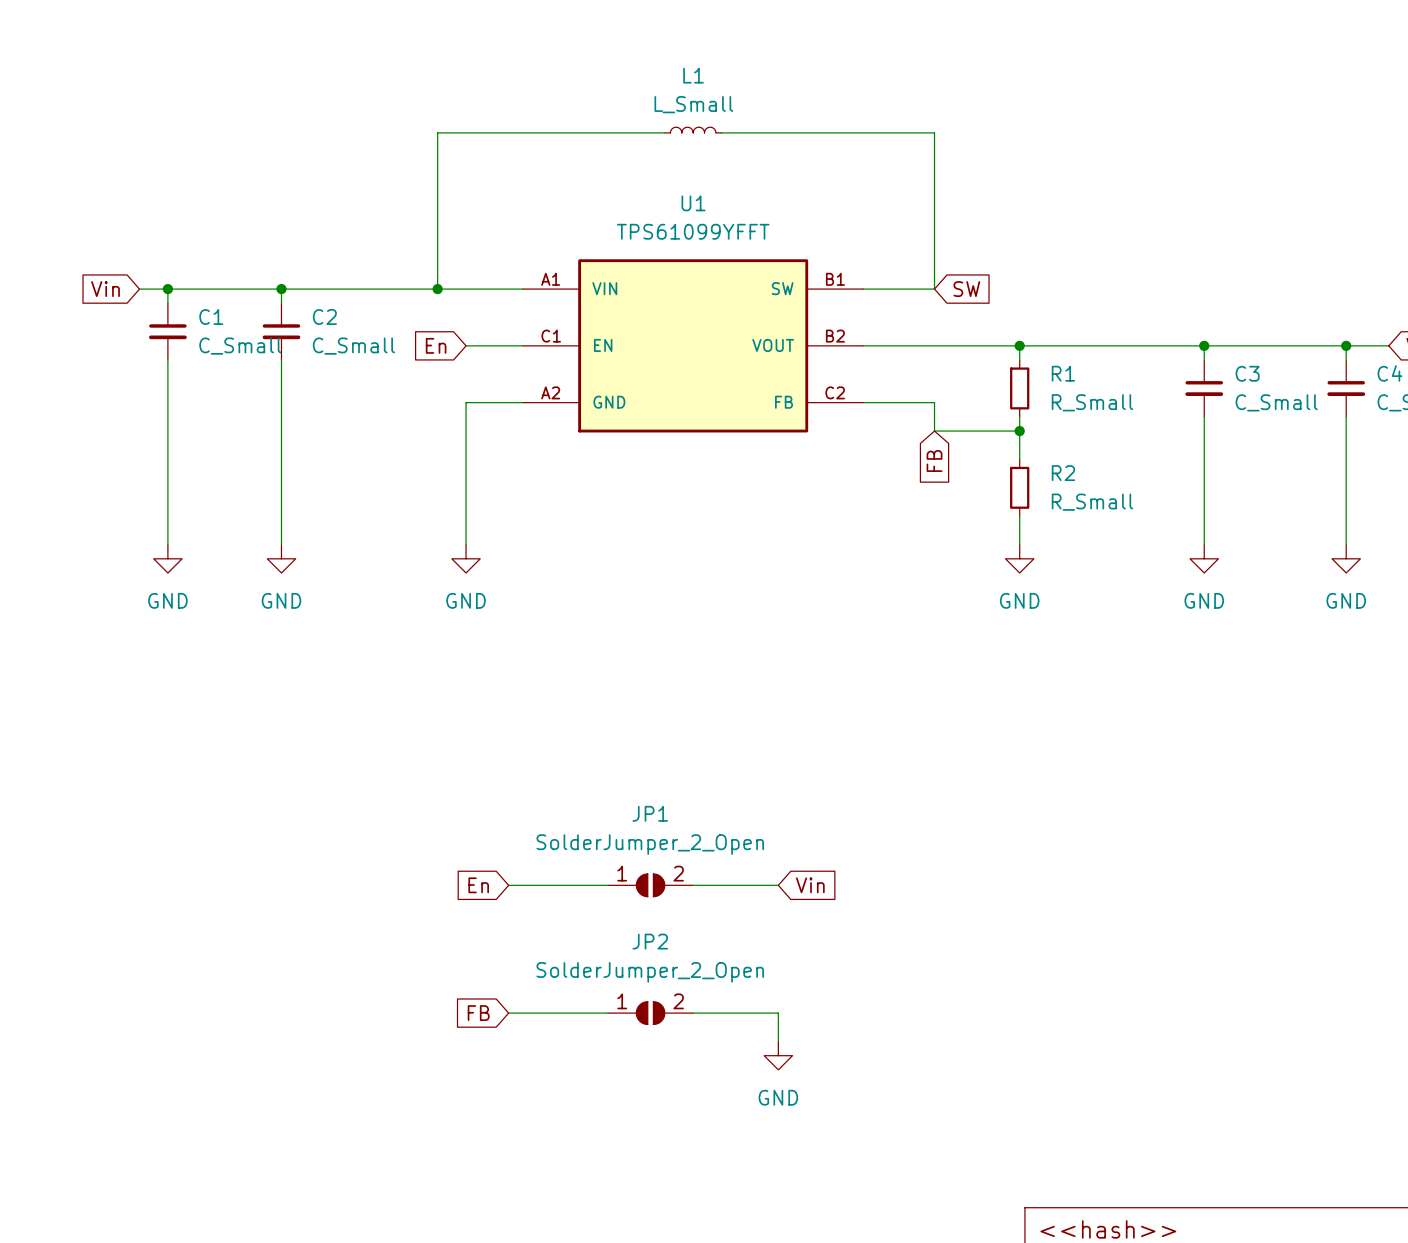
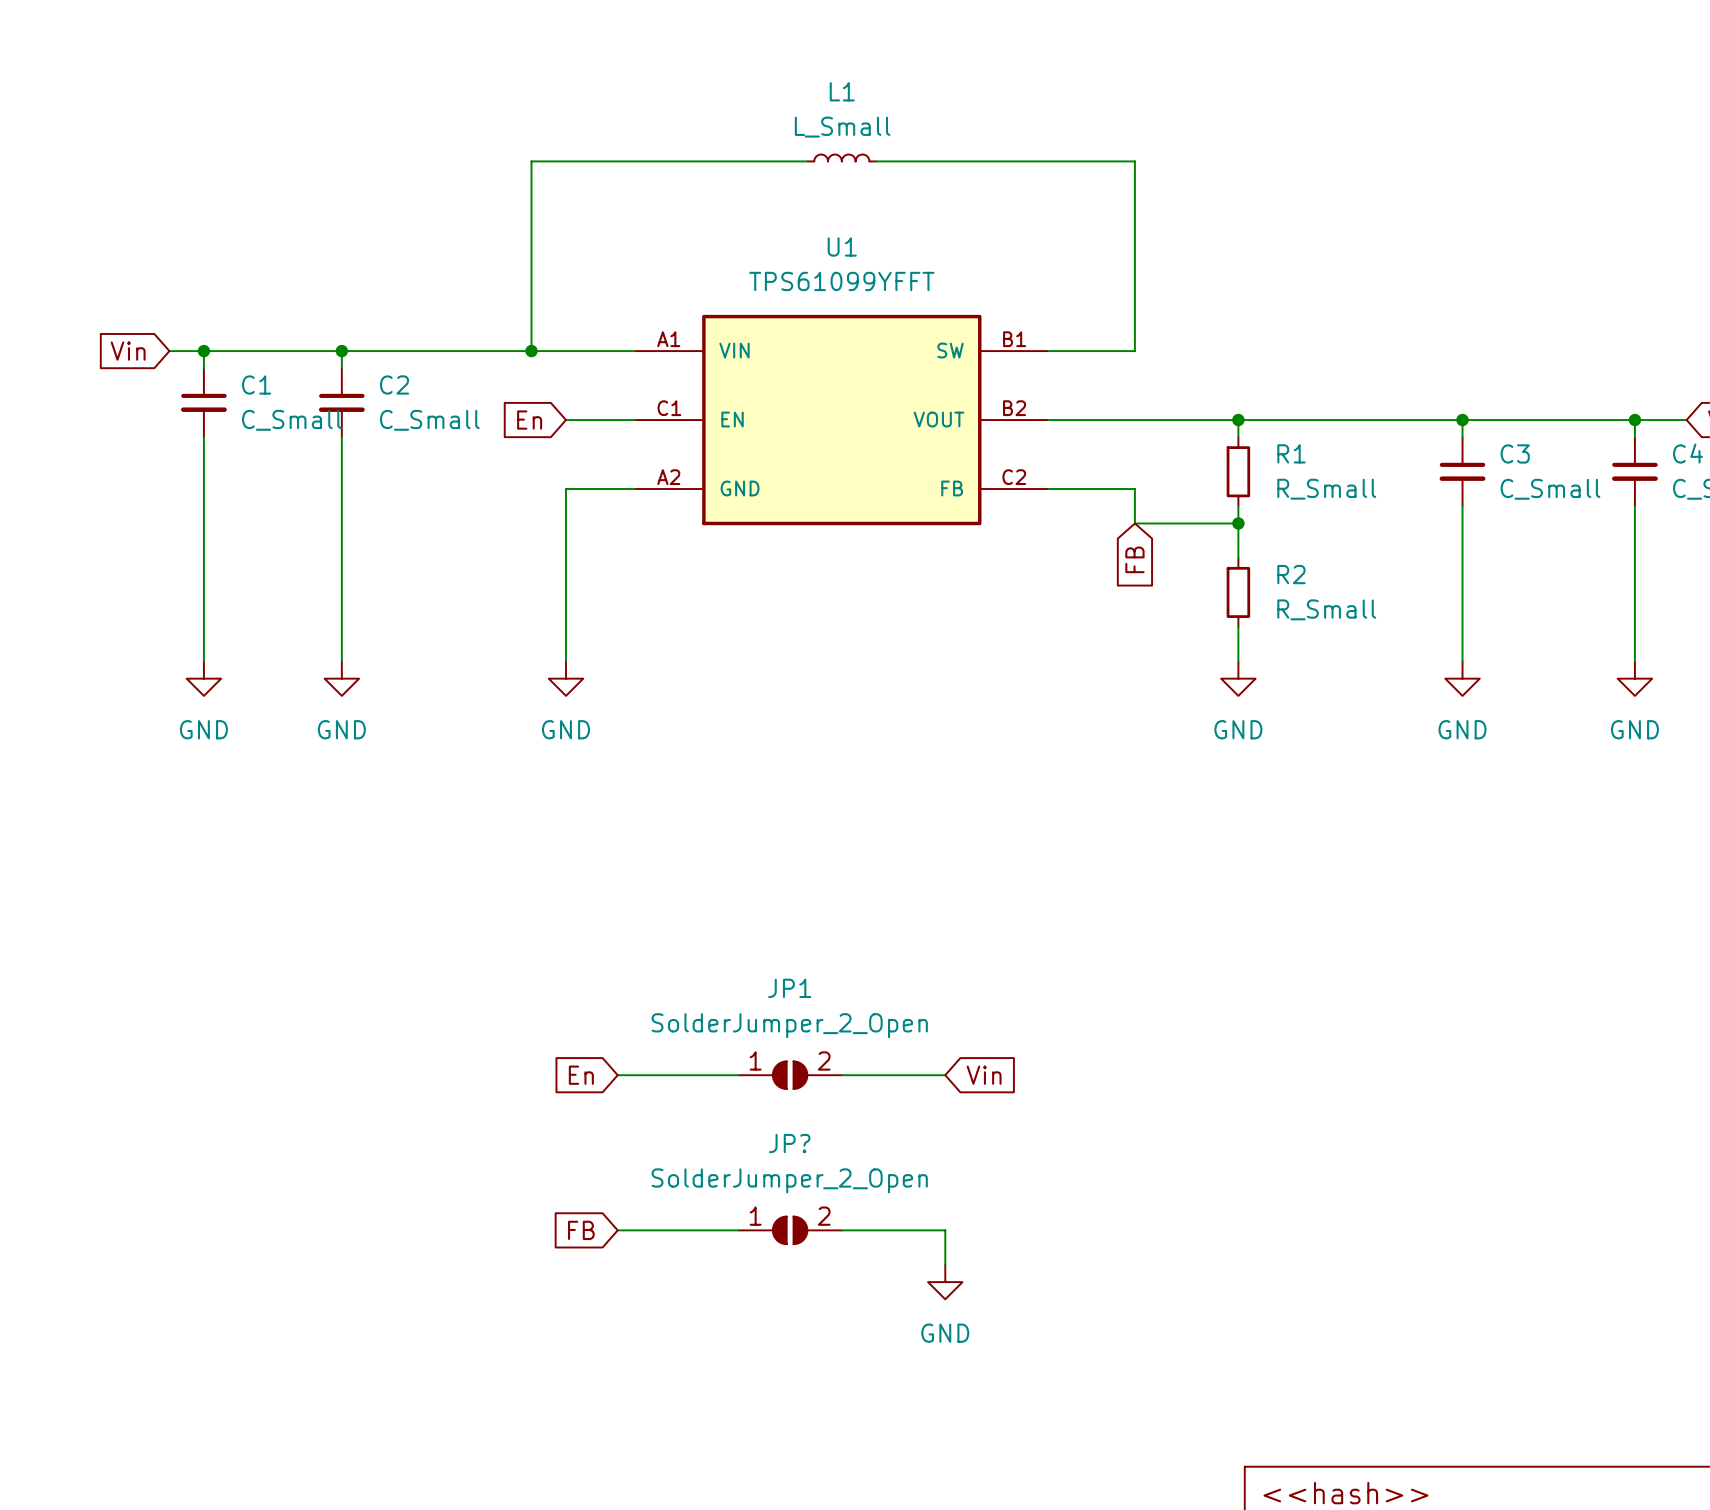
global label: SW (966, 289) -> none
JP2 name: JP2 (650, 941) -> JP? (789, 1143)

